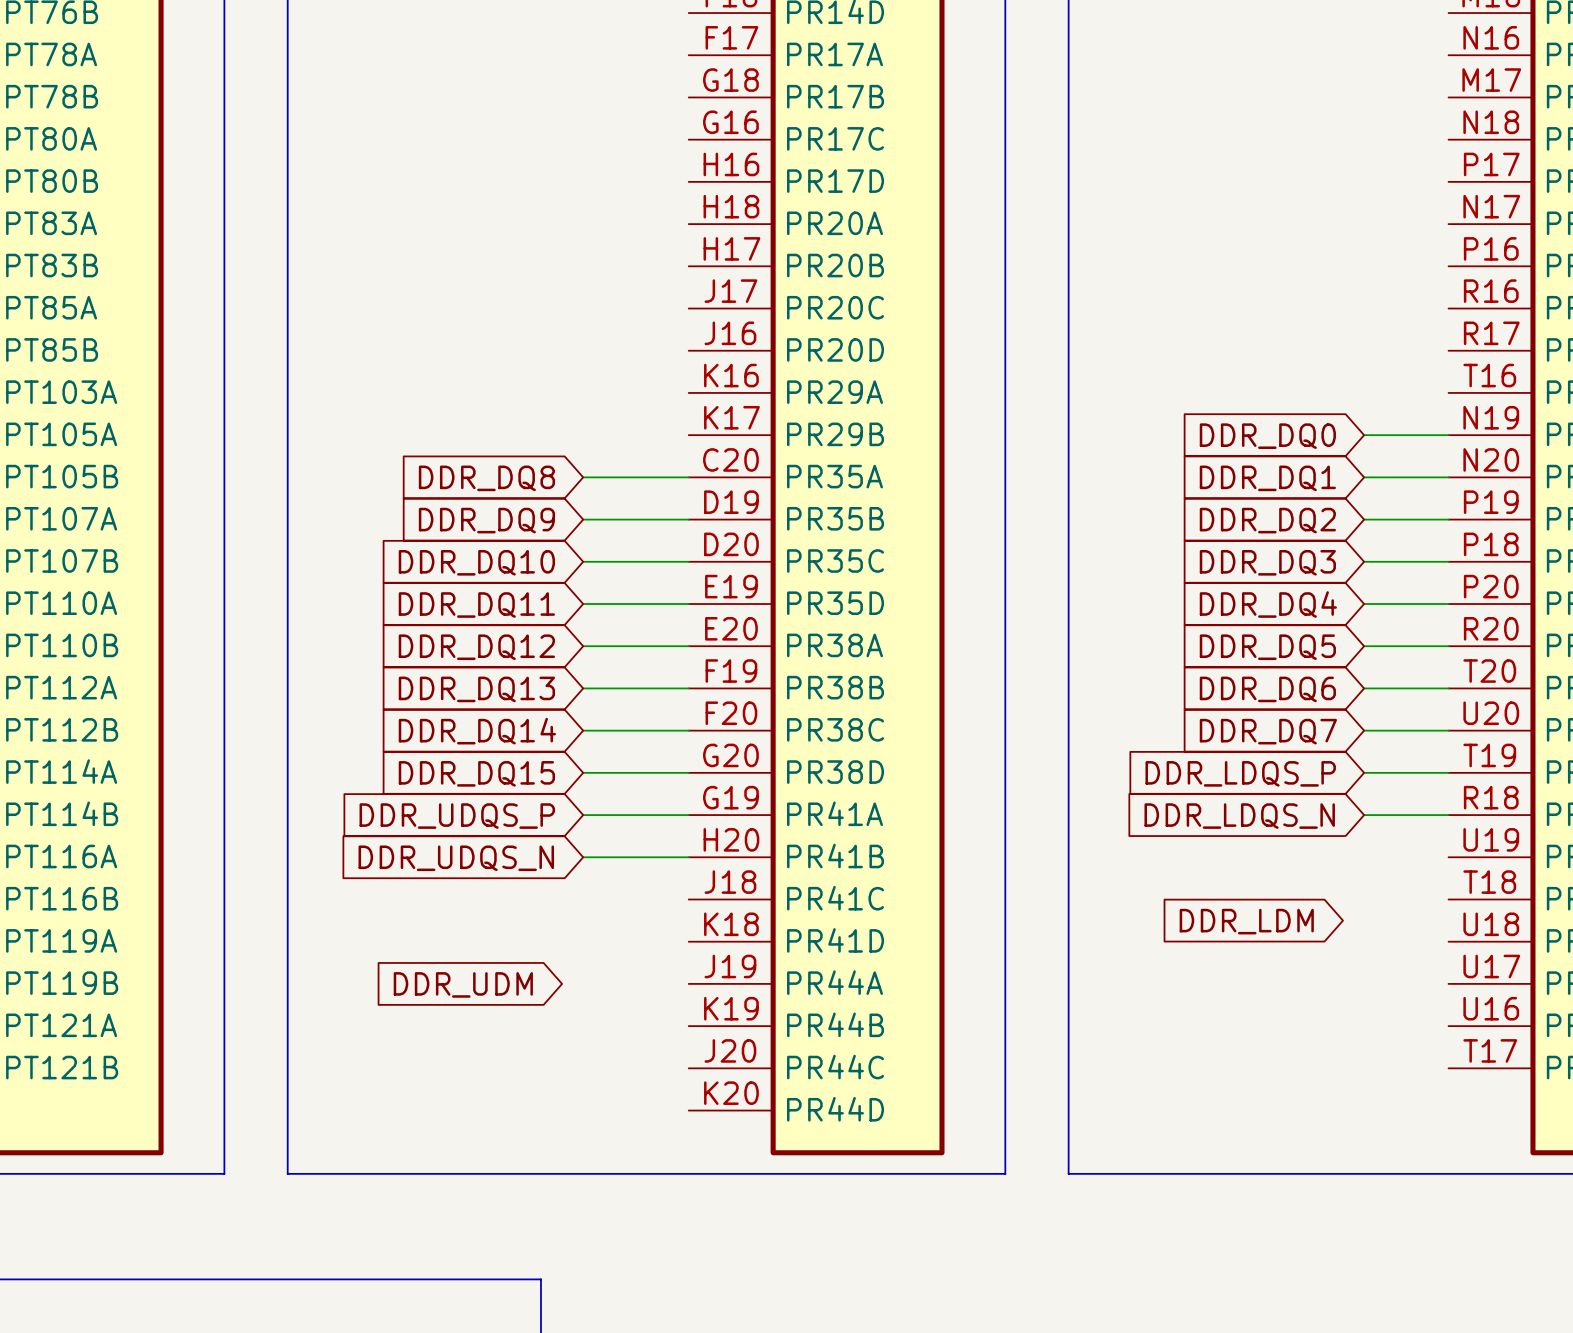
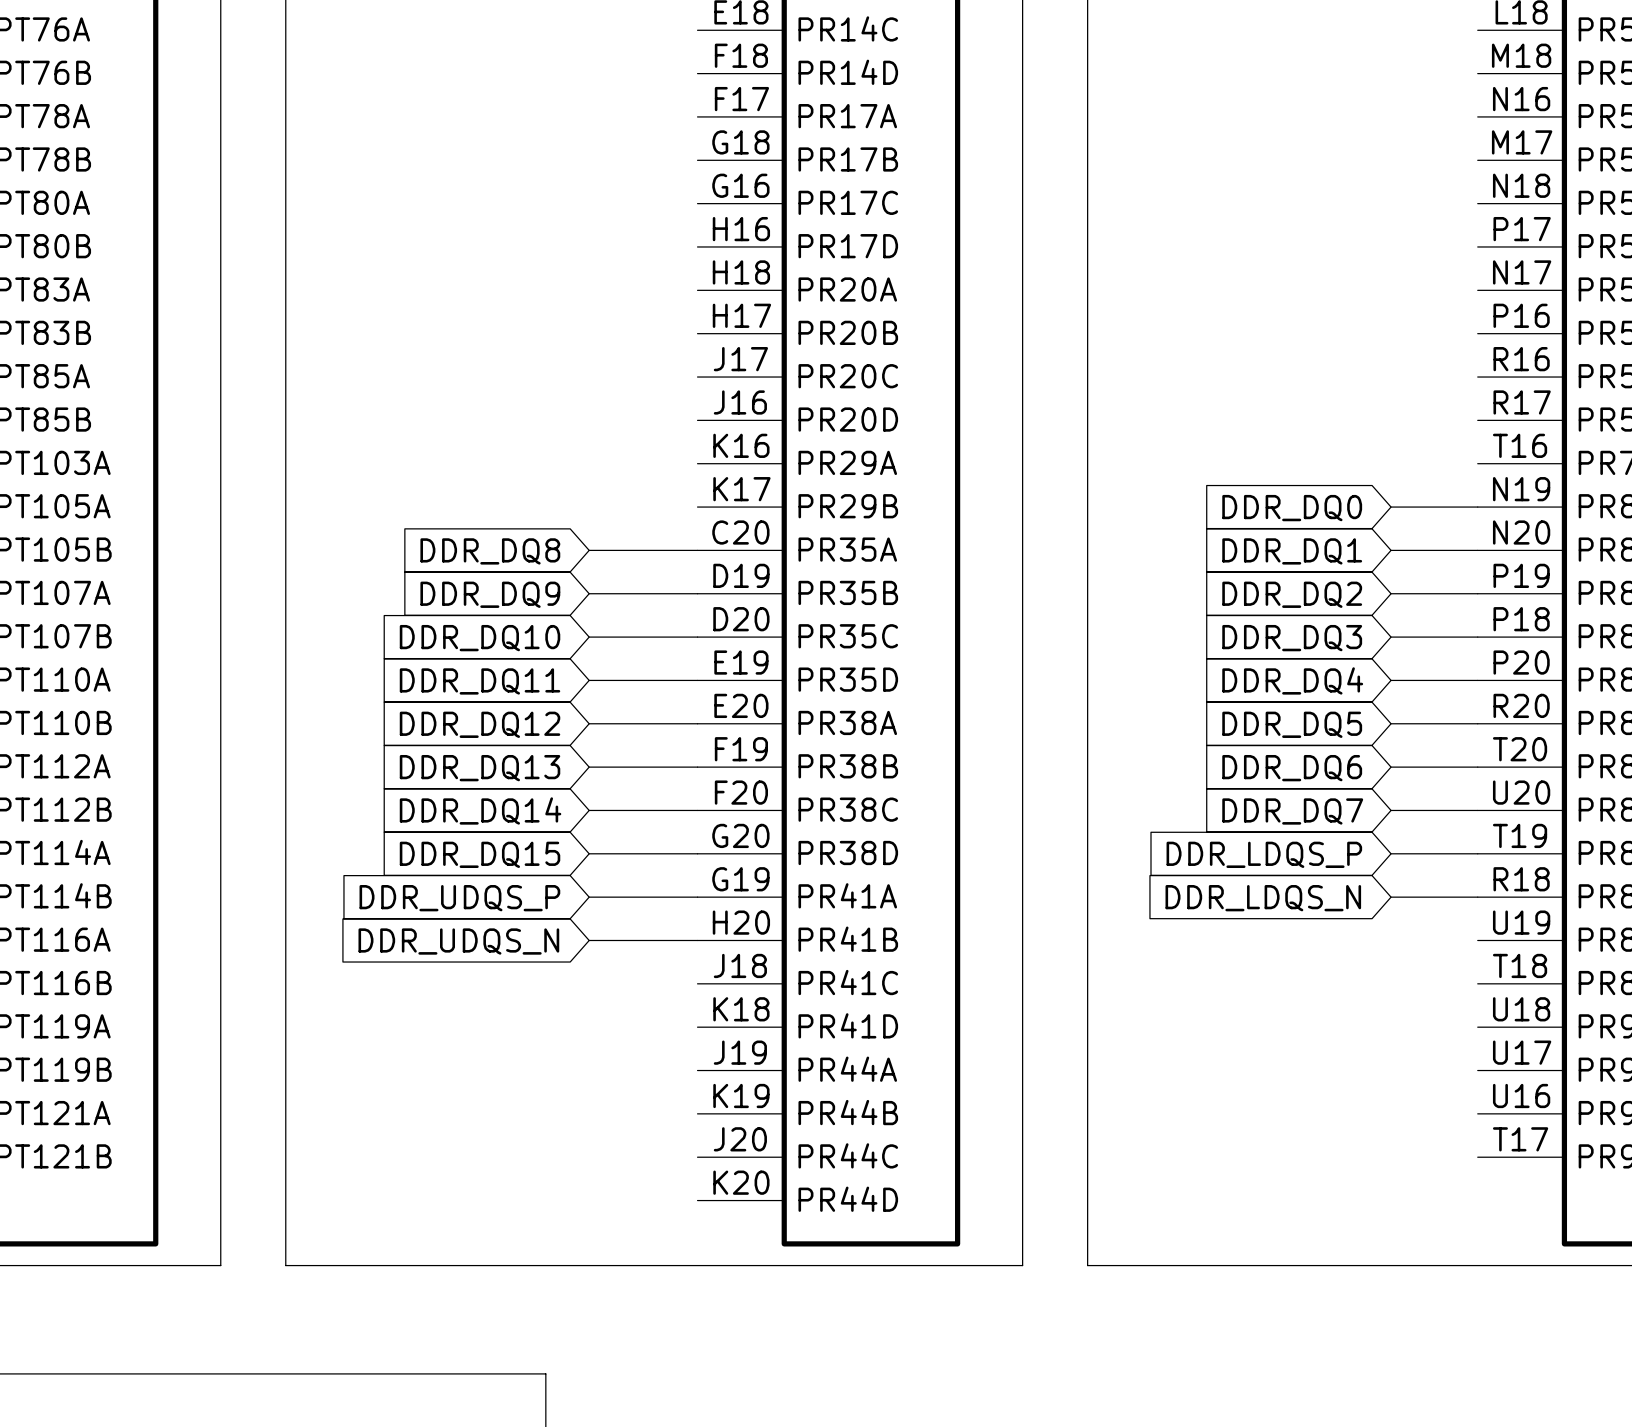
global label: DDR_LDM (1246, 921) -> none
global label: DDR_UDM (463, 984) -> none

